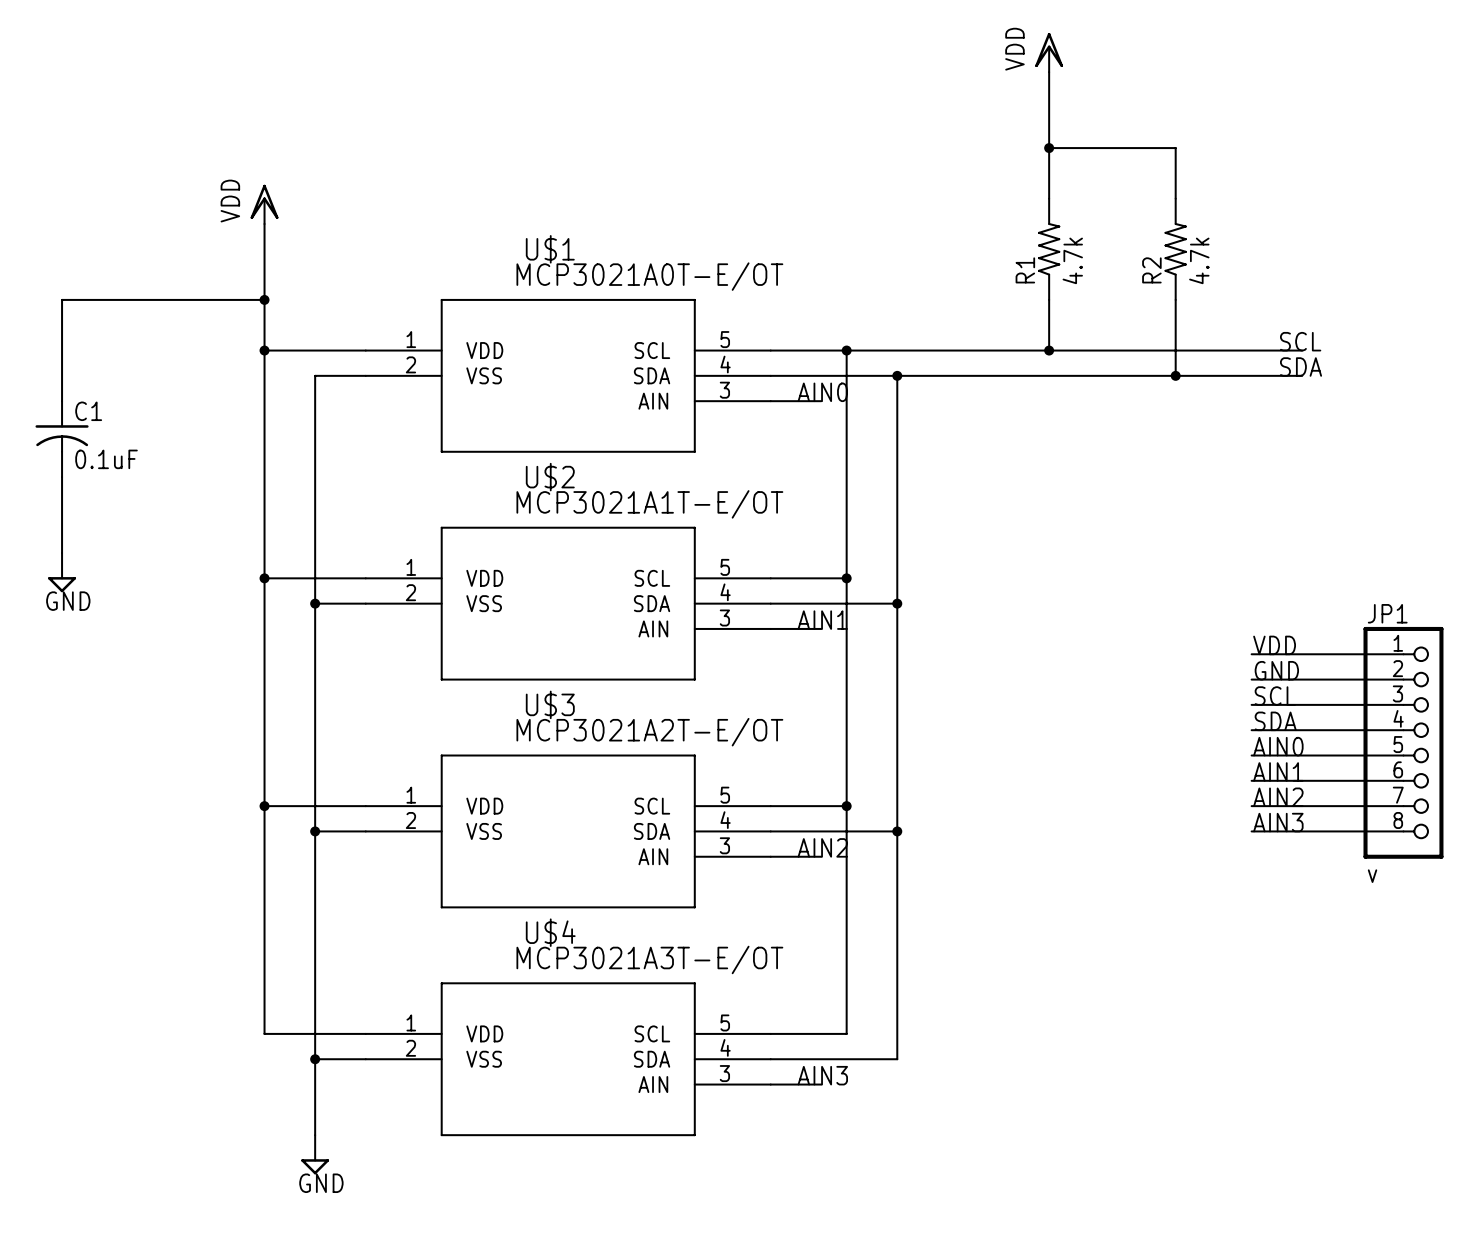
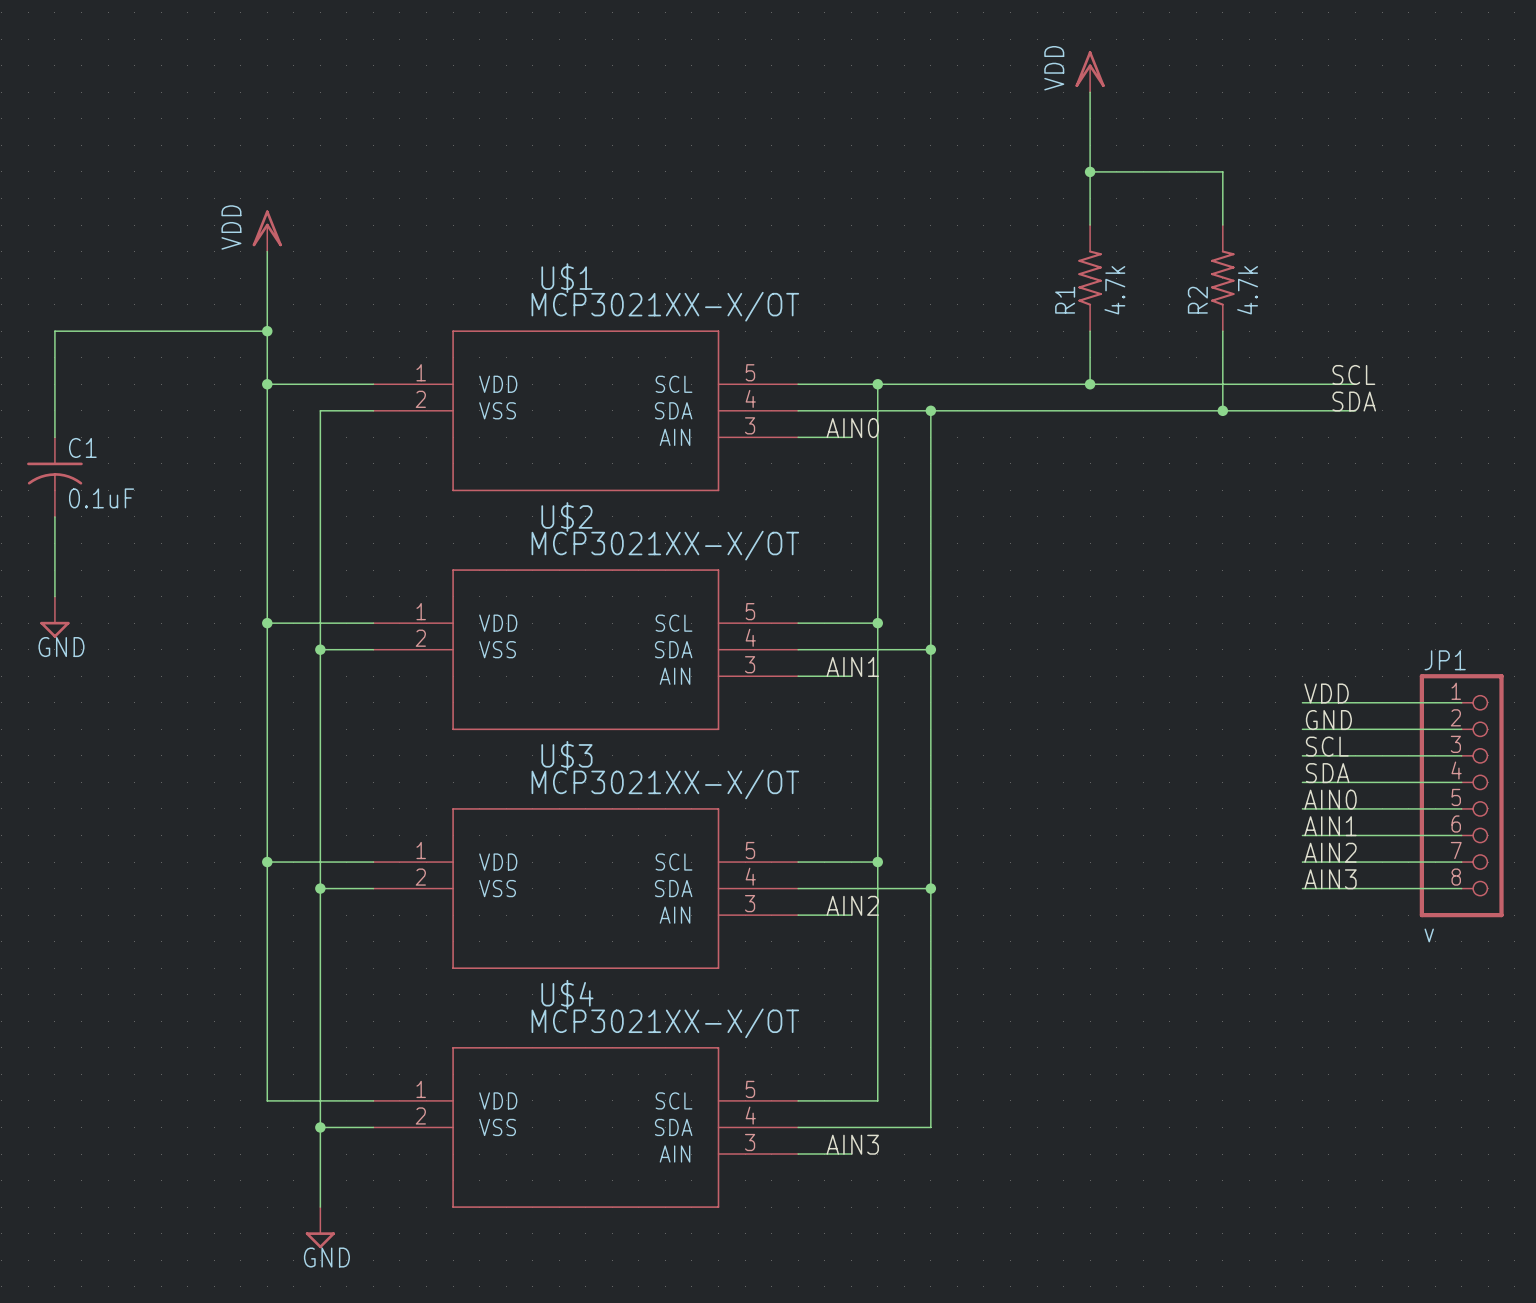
U$1 value: MCP3021A0T-E/OT (649, 276) -> MCP3021XX-X/OT (665, 306)
U$2 value: MCP3021A1T-E/OT (649, 504) -> MCP3021XX-X/OT (665, 545)
U$3 value: MCP3021A2T-E/OT (649, 732) -> MCP3021XX-X/OT (665, 784)
U$4 value: MCP3021A3T-E/OT (649, 959) -> MCP3021XX-X/OT (665, 1023)

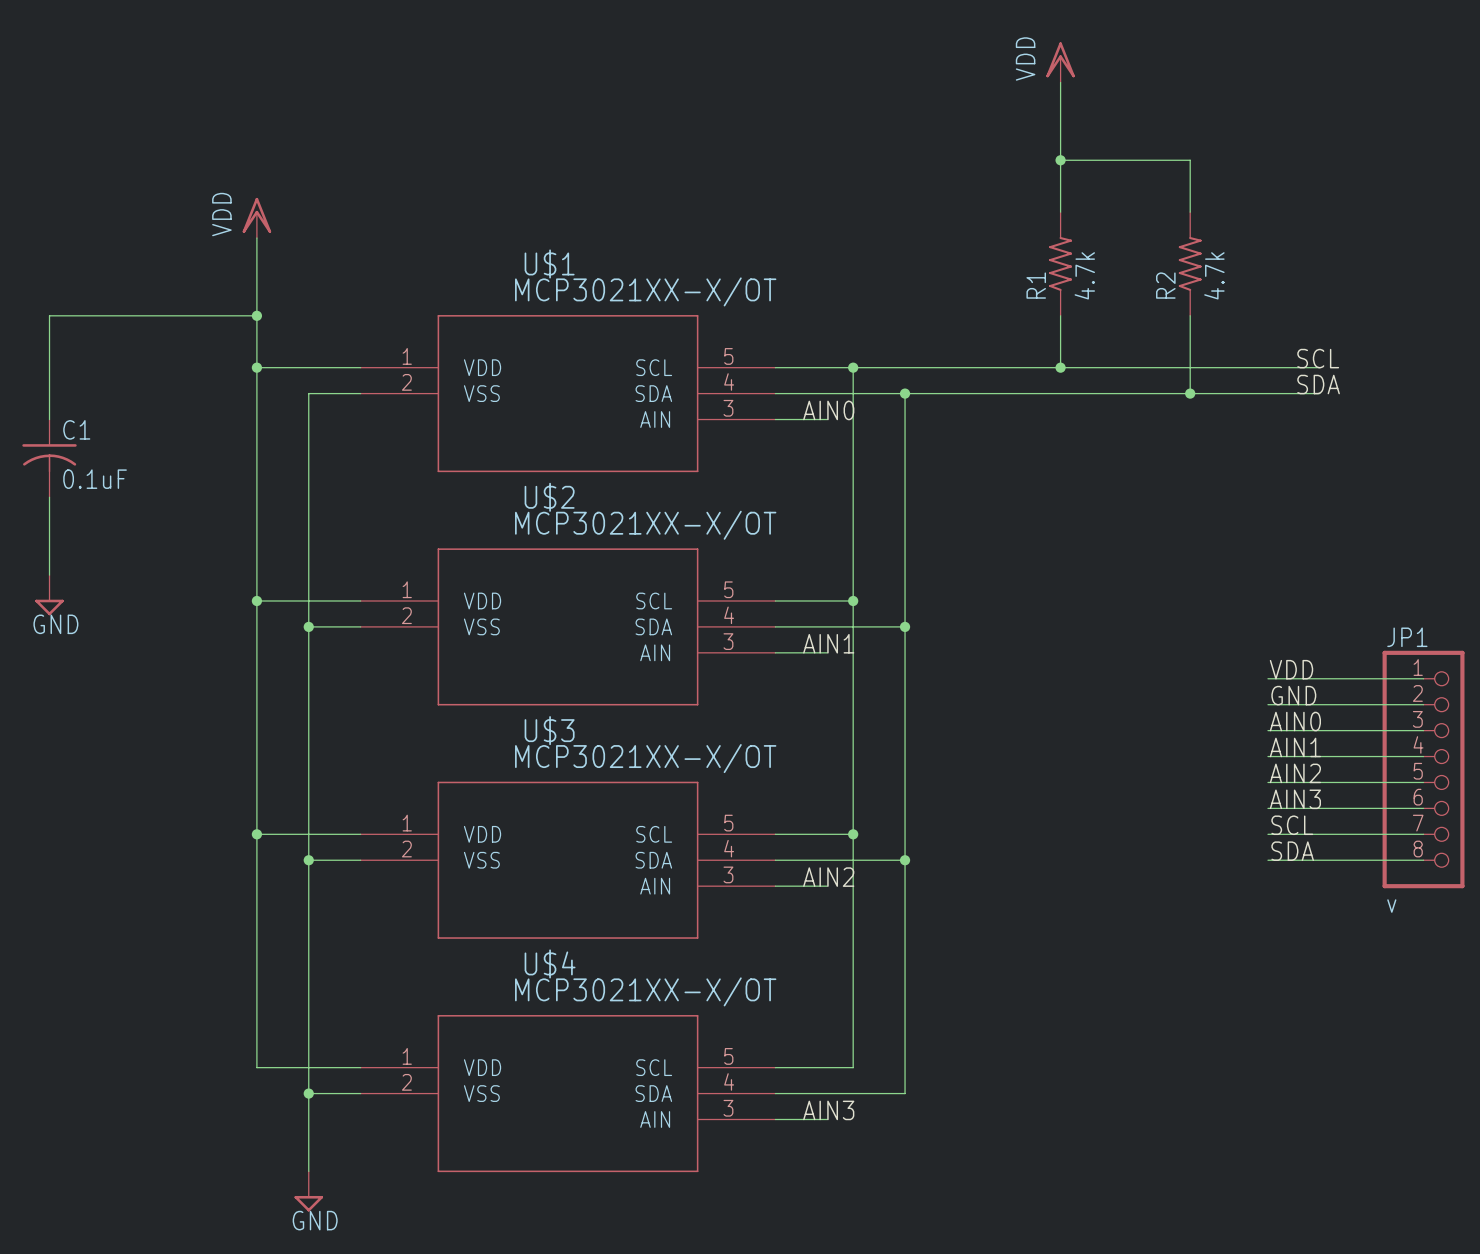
label: SCL (1327, 746) -> AIN0 (1295, 721)
label: SDA (1327, 773) -> AIN1 (1295, 747)
label: AIN0 (1330, 799) -> AIN2 (1295, 773)
label: AIN1 (1330, 826) -> AIN3 (1295, 799)
label: AIN2 (1330, 852) -> SCL (1292, 825)
label: AIN3 (1330, 879) -> SDA (1292, 851)

